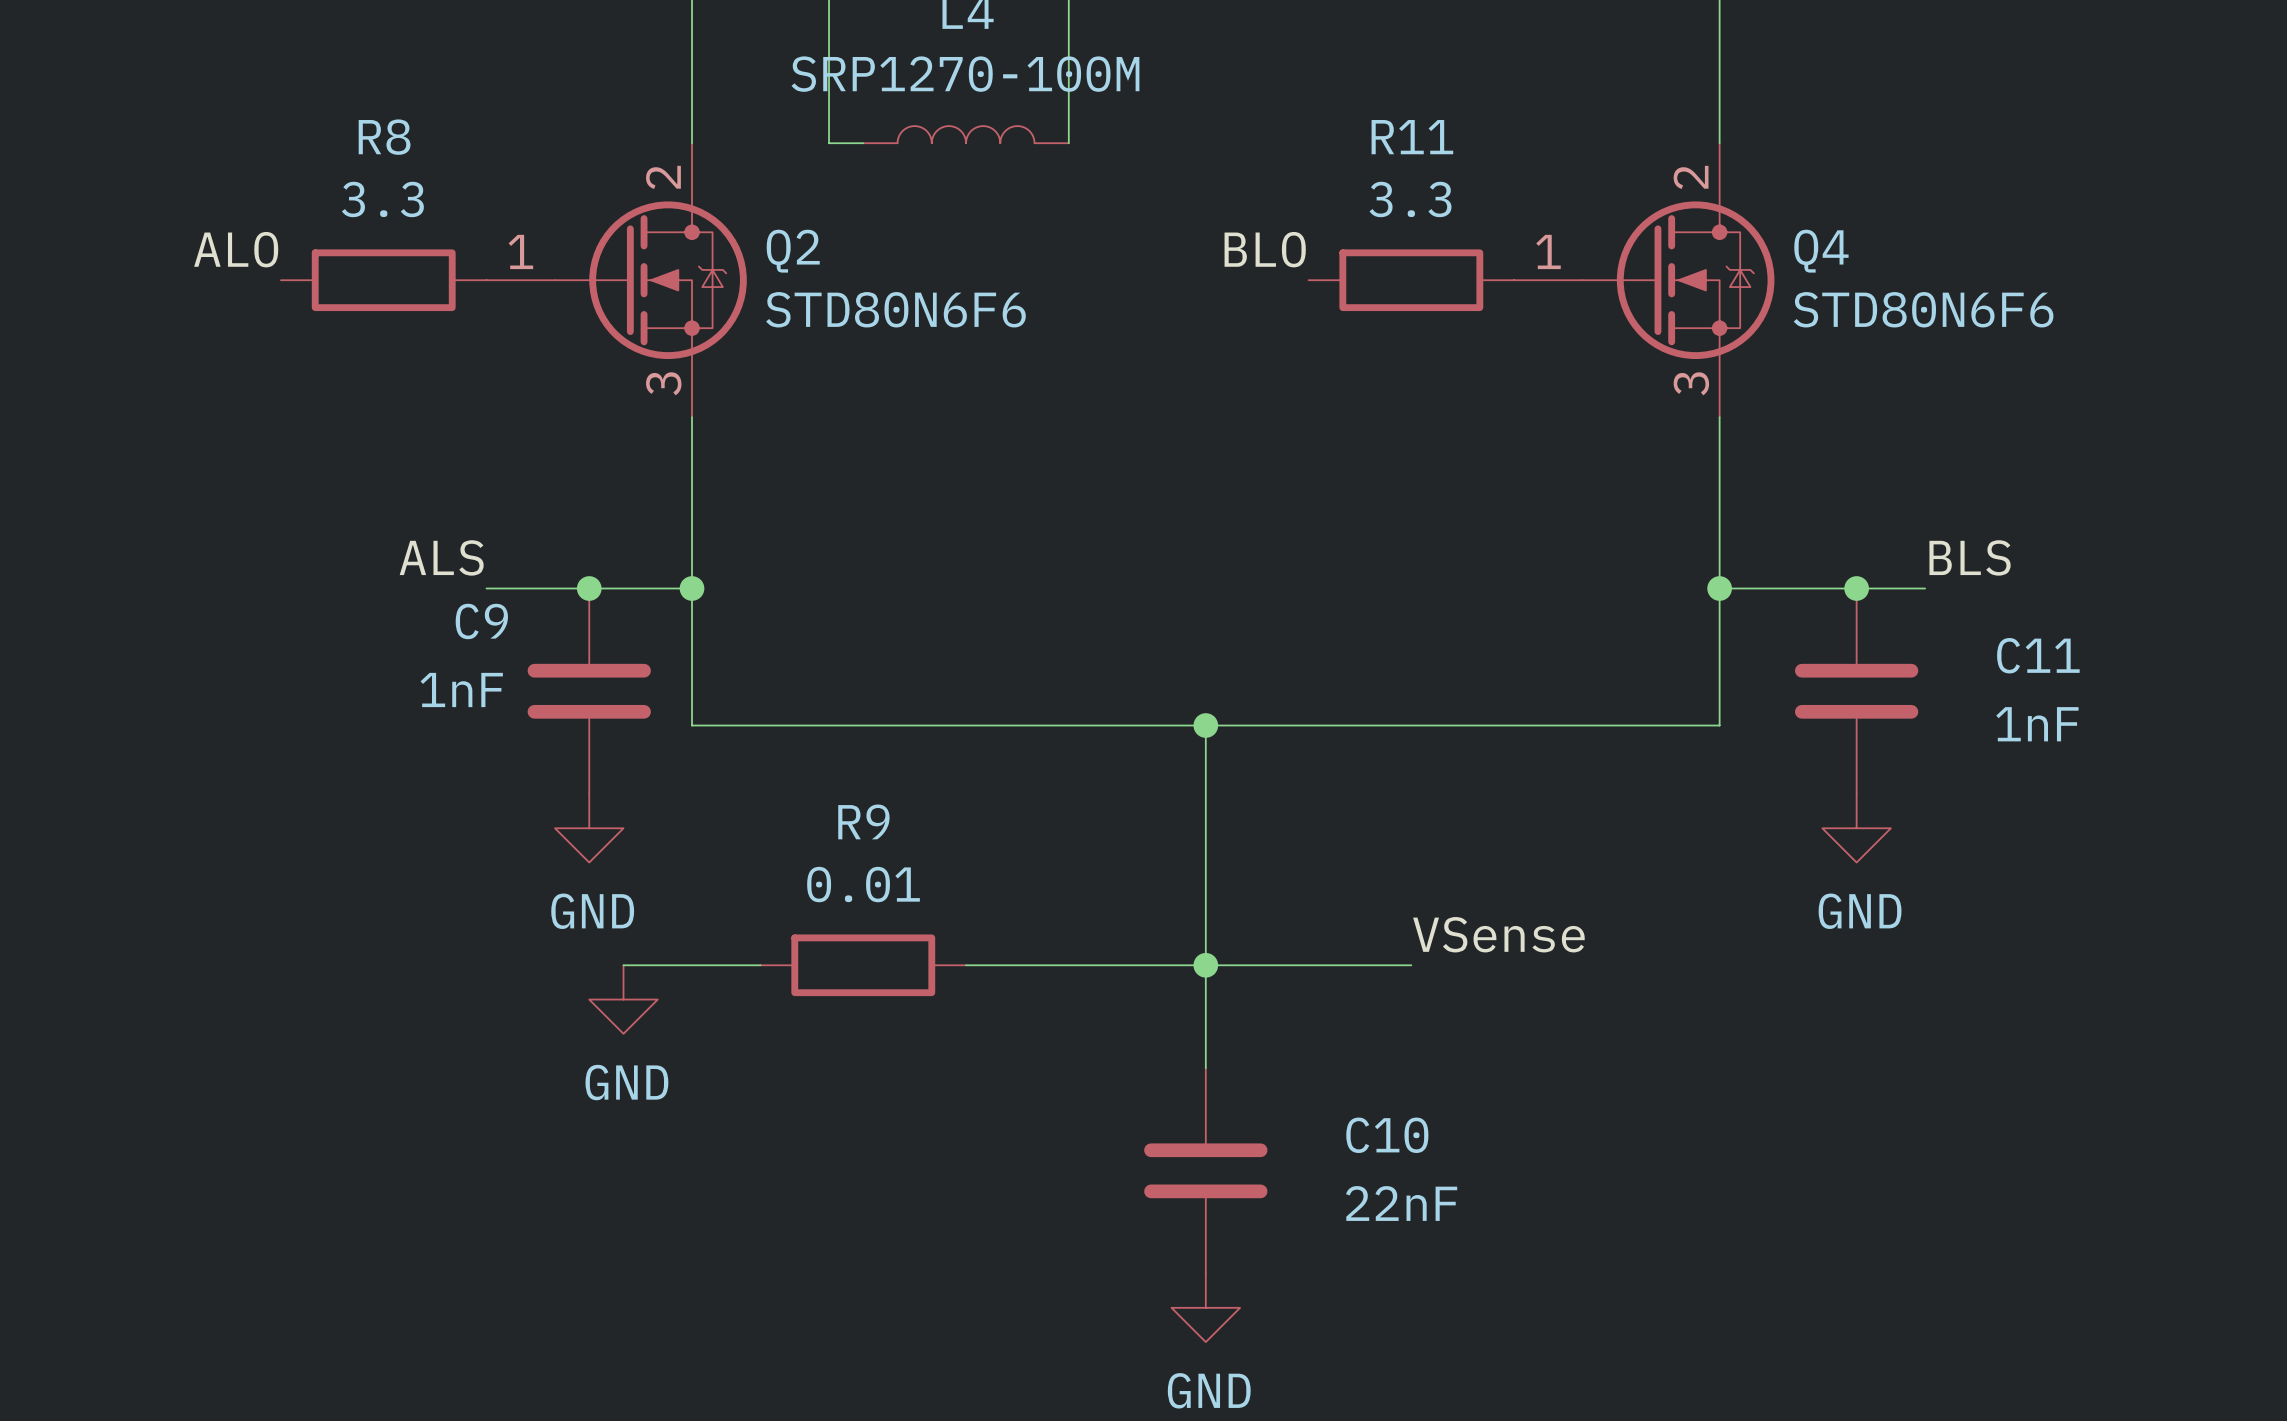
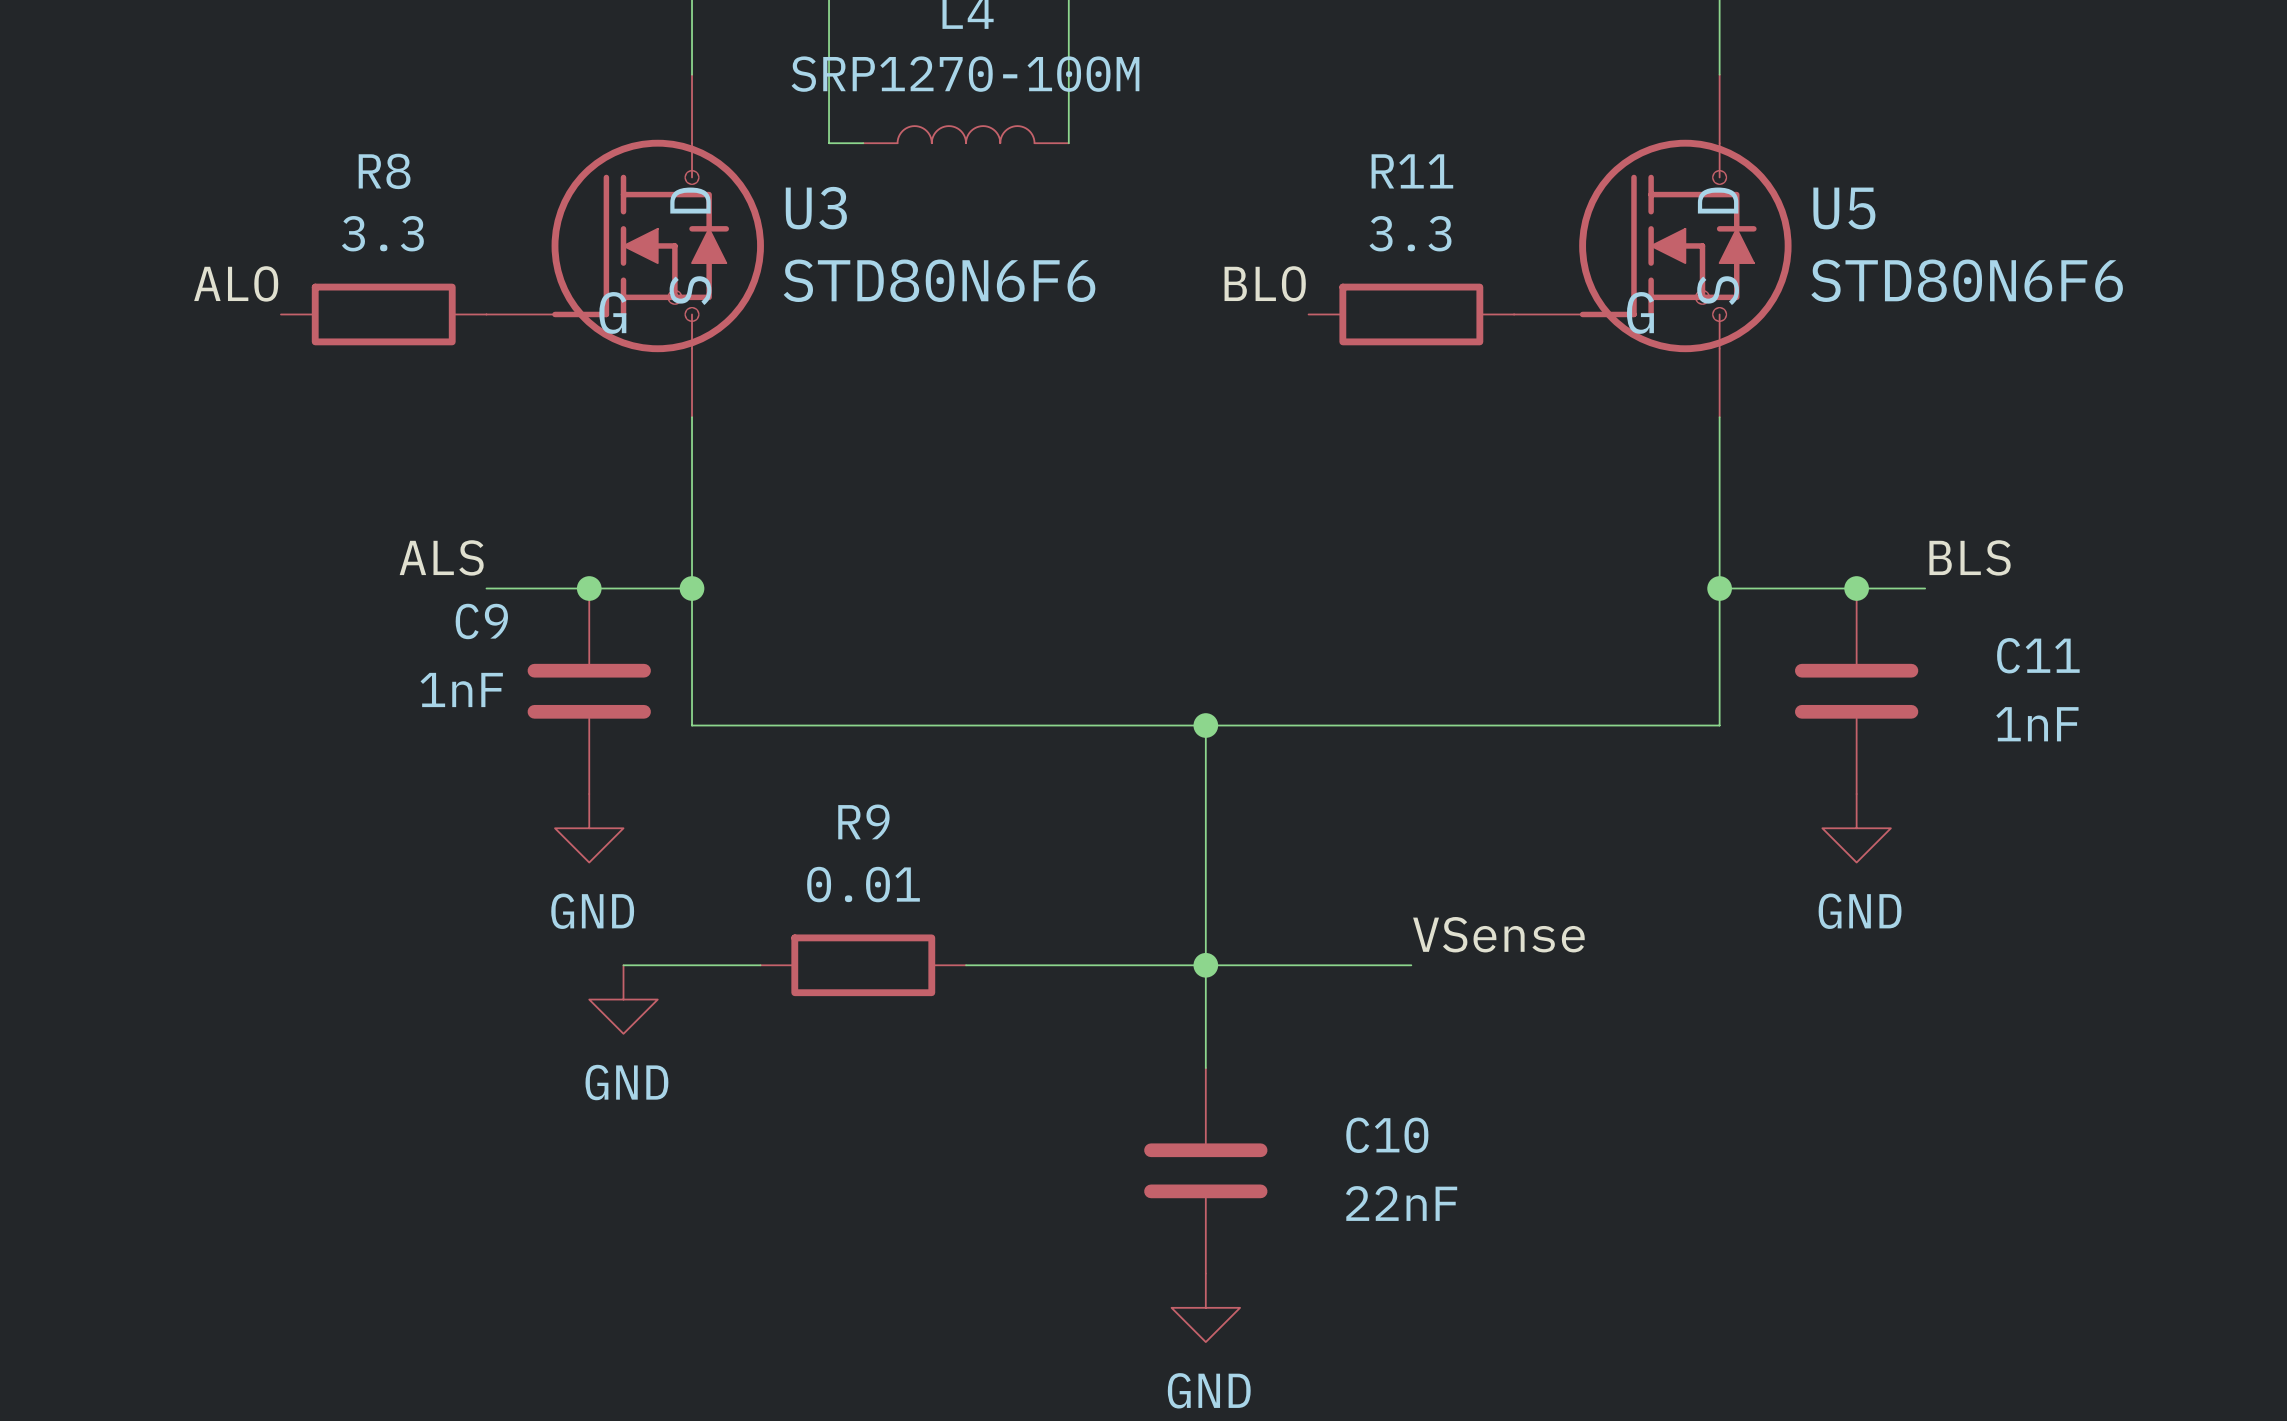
U3: none -> STD80N6F6 (625, 245)
U5: none -> STD80N6F6 (1652, 245)
label position: ALO (236, 249) -> ALO (236, 283)
label position: BLO (1265, 249) -> BLO (1265, 283)
R8 position: (383, 280) -> (383, 314)
Q2: STD80N6F6 (616, 280) -> none
R11 position: (1411, 280) -> (1411, 314)
Q4: STD80N6F6 (1644, 280) -> none

